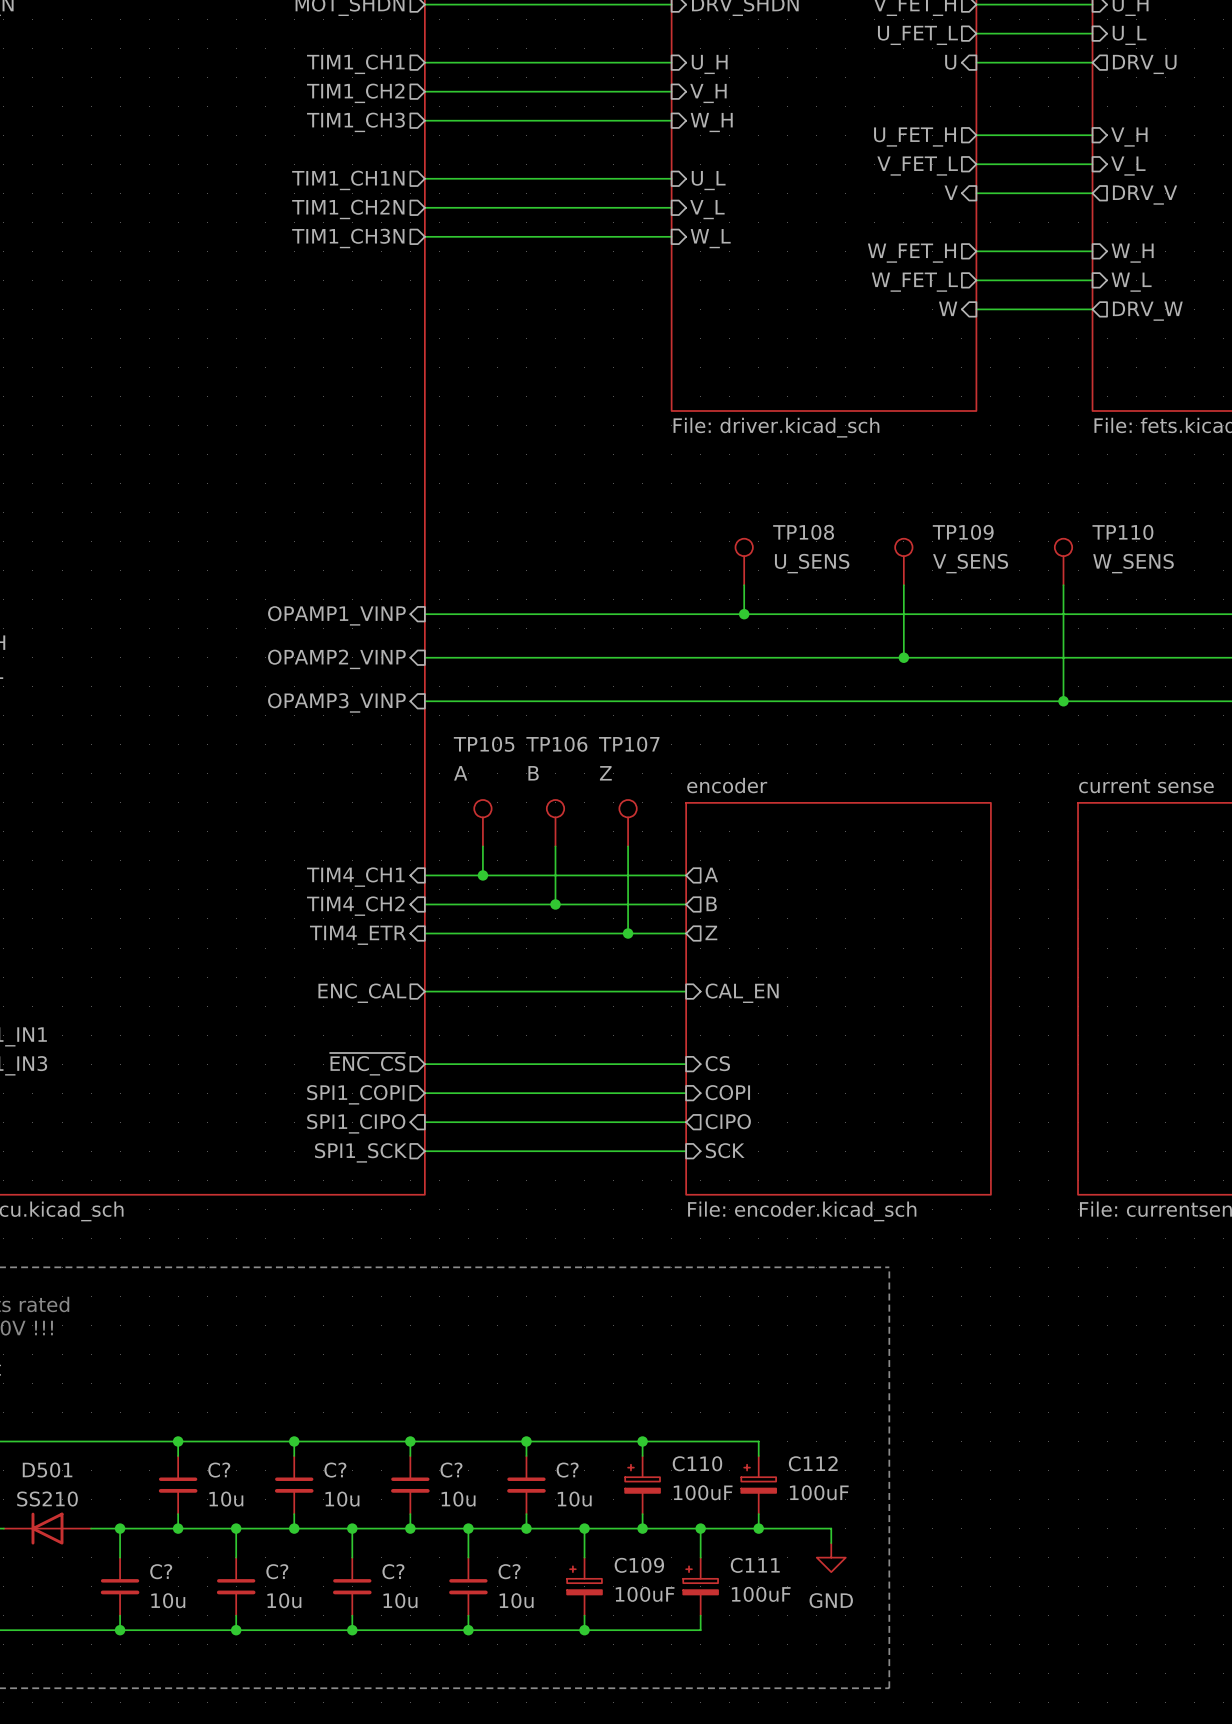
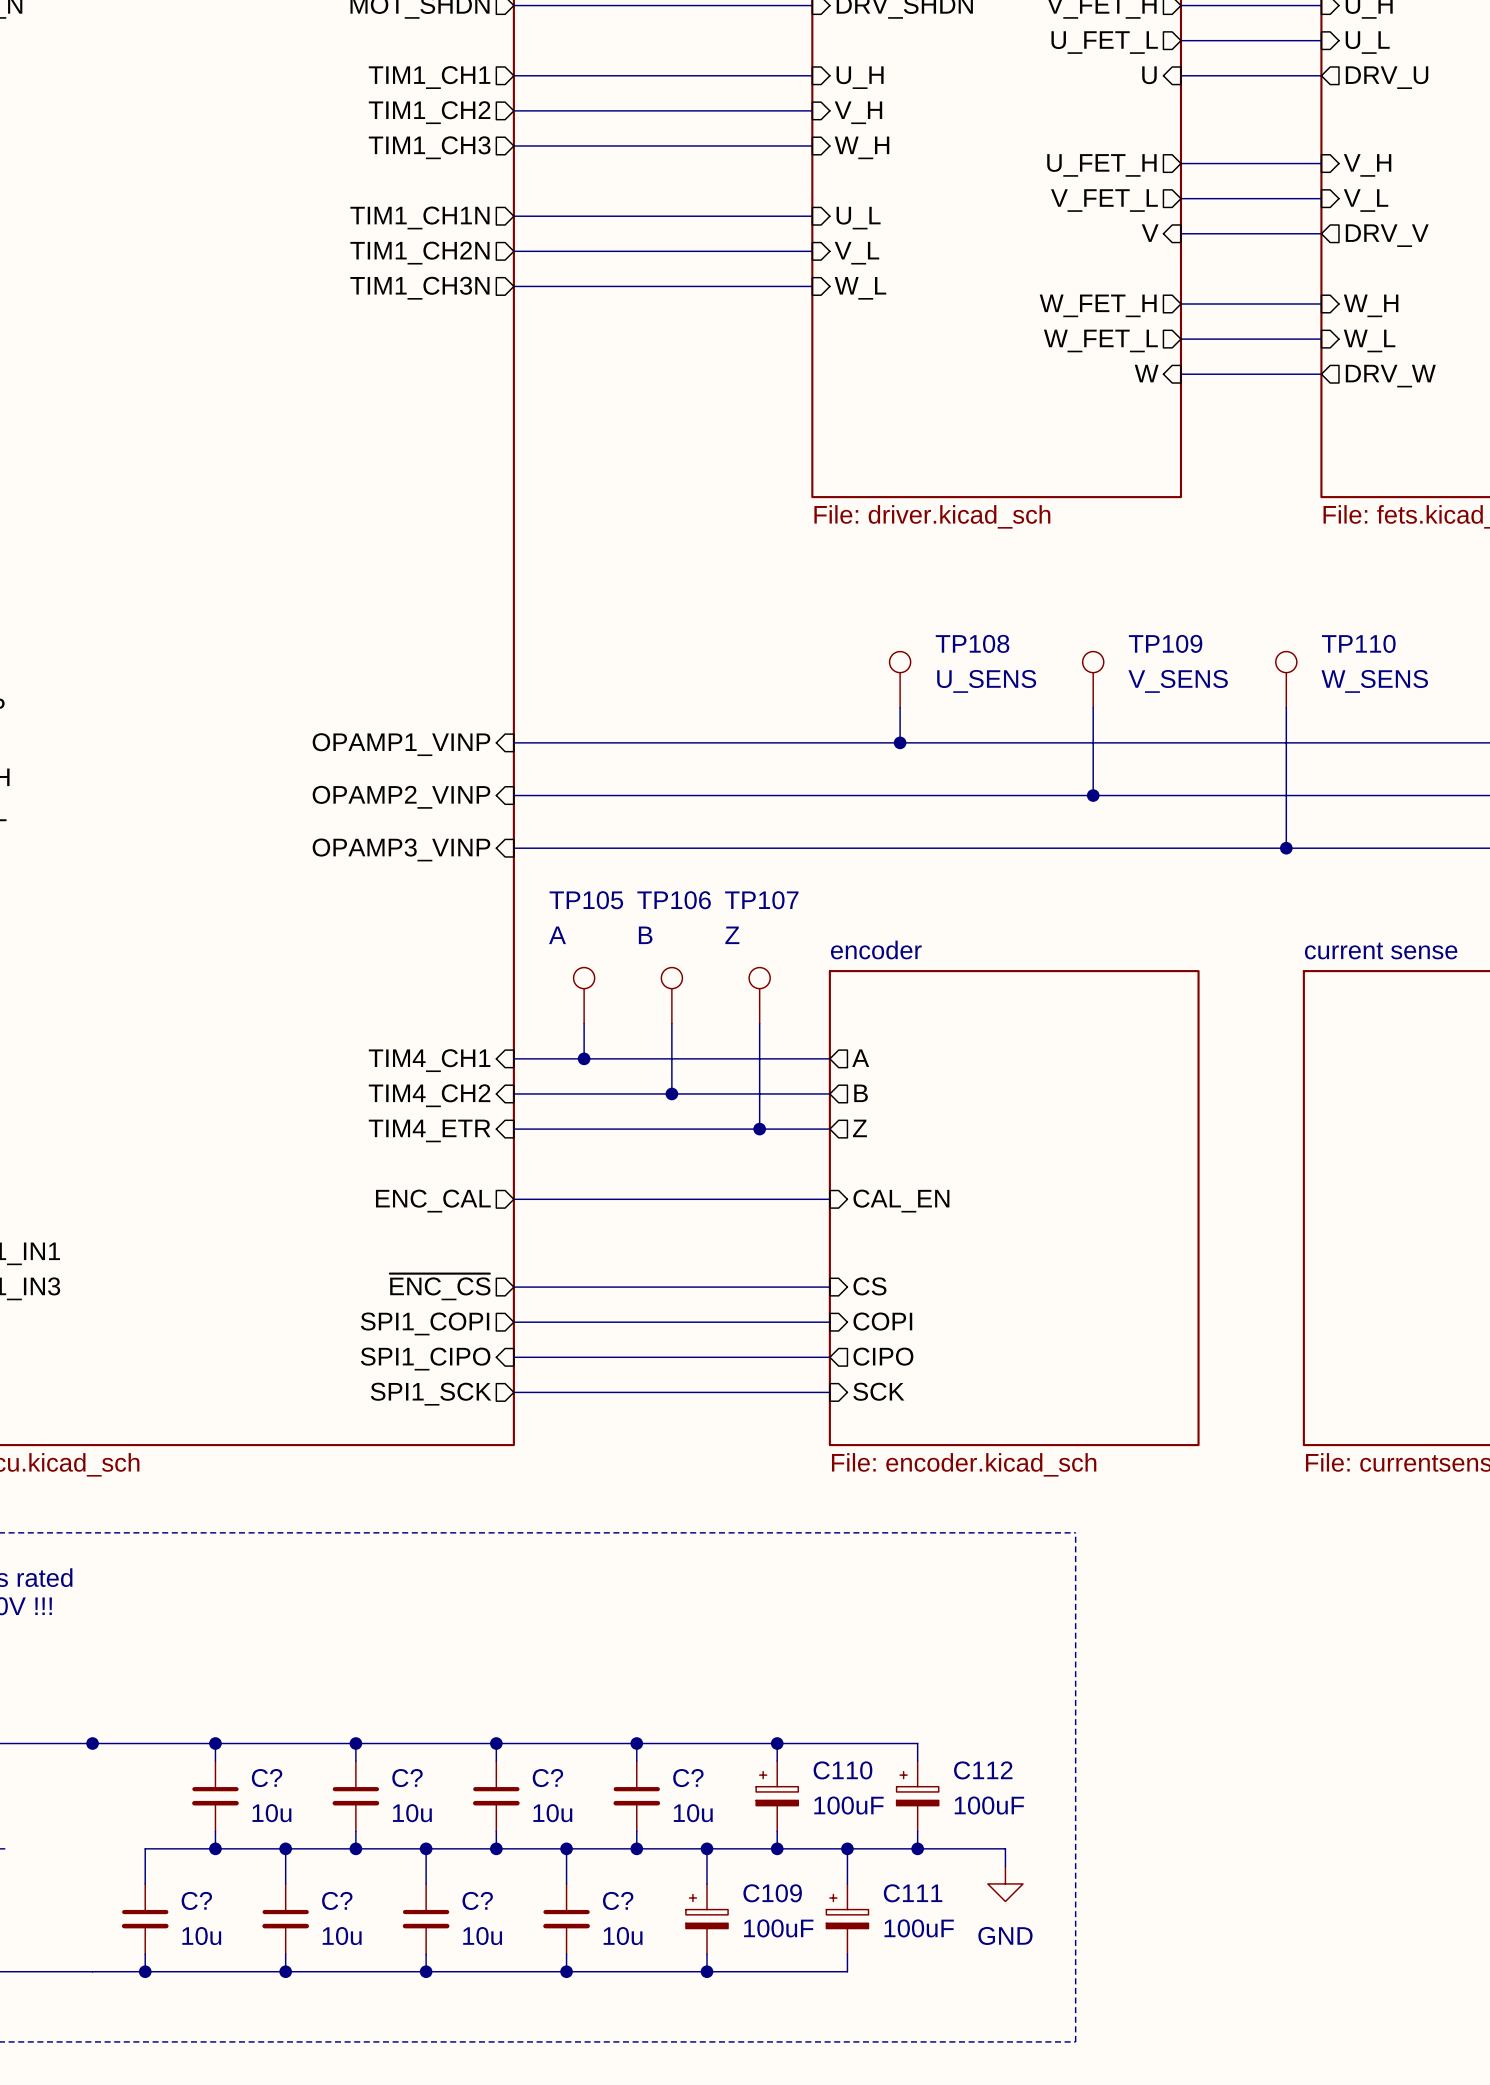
junction: none -> (92, 1743)
D501: SS210 (47, 1528) -> none
wire: (91, 1528) (120, 1528) -> none
junction: (120, 1528) -> none

